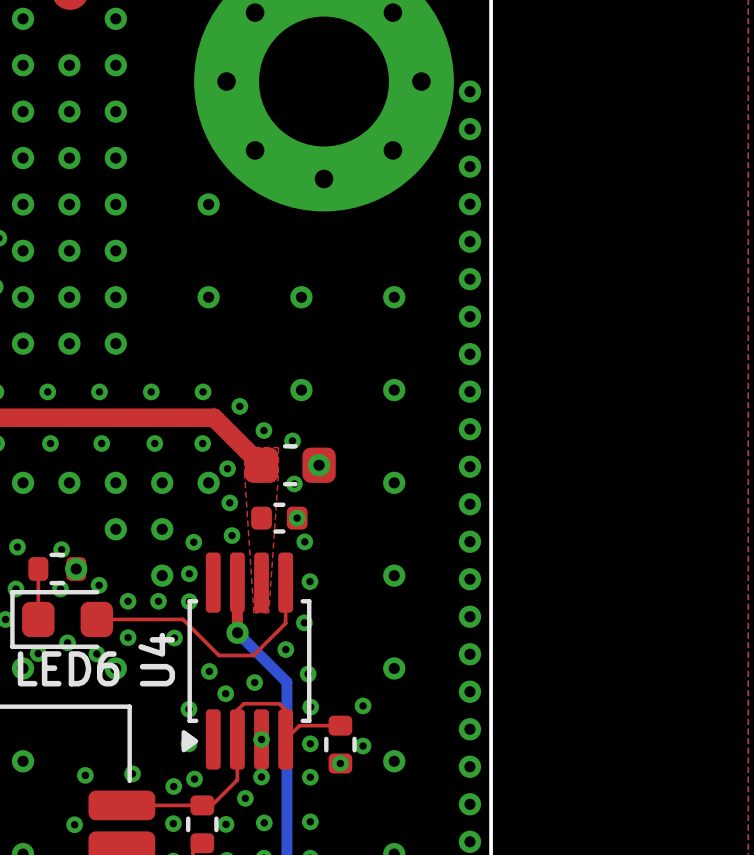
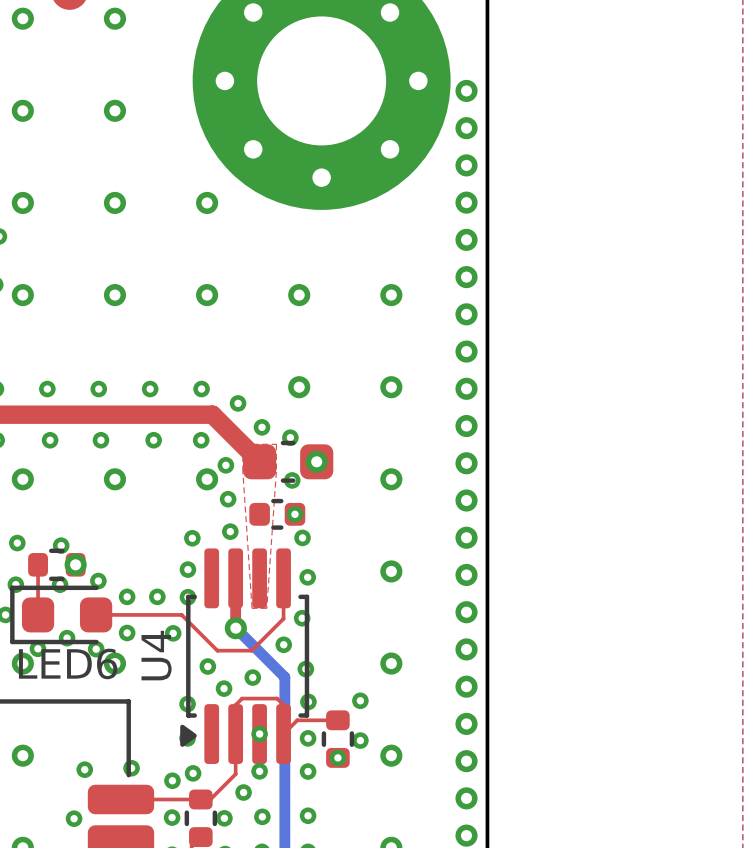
via: (23, 65) -> none
via: (69, 65) -> none
via: (115, 65) -> none
via: (69, 111) -> none
via: (23, 158) -> none
via: (69, 158) -> none
via: (115, 158) -> none
via: (69, 204) -> none
via: (23, 250) -> none
via: (69, 250) -> none
via: (115, 250) -> none
via: (69, 297) -> none
via: (23, 343) -> none
via: (69, 343) -> none
via: (115, 343) -> none
via: (69, 482) -> none
via: (162, 482) -> none
via: (115, 529) -> none
via: (162, 529) -> none
via: (162, 575) -> none

